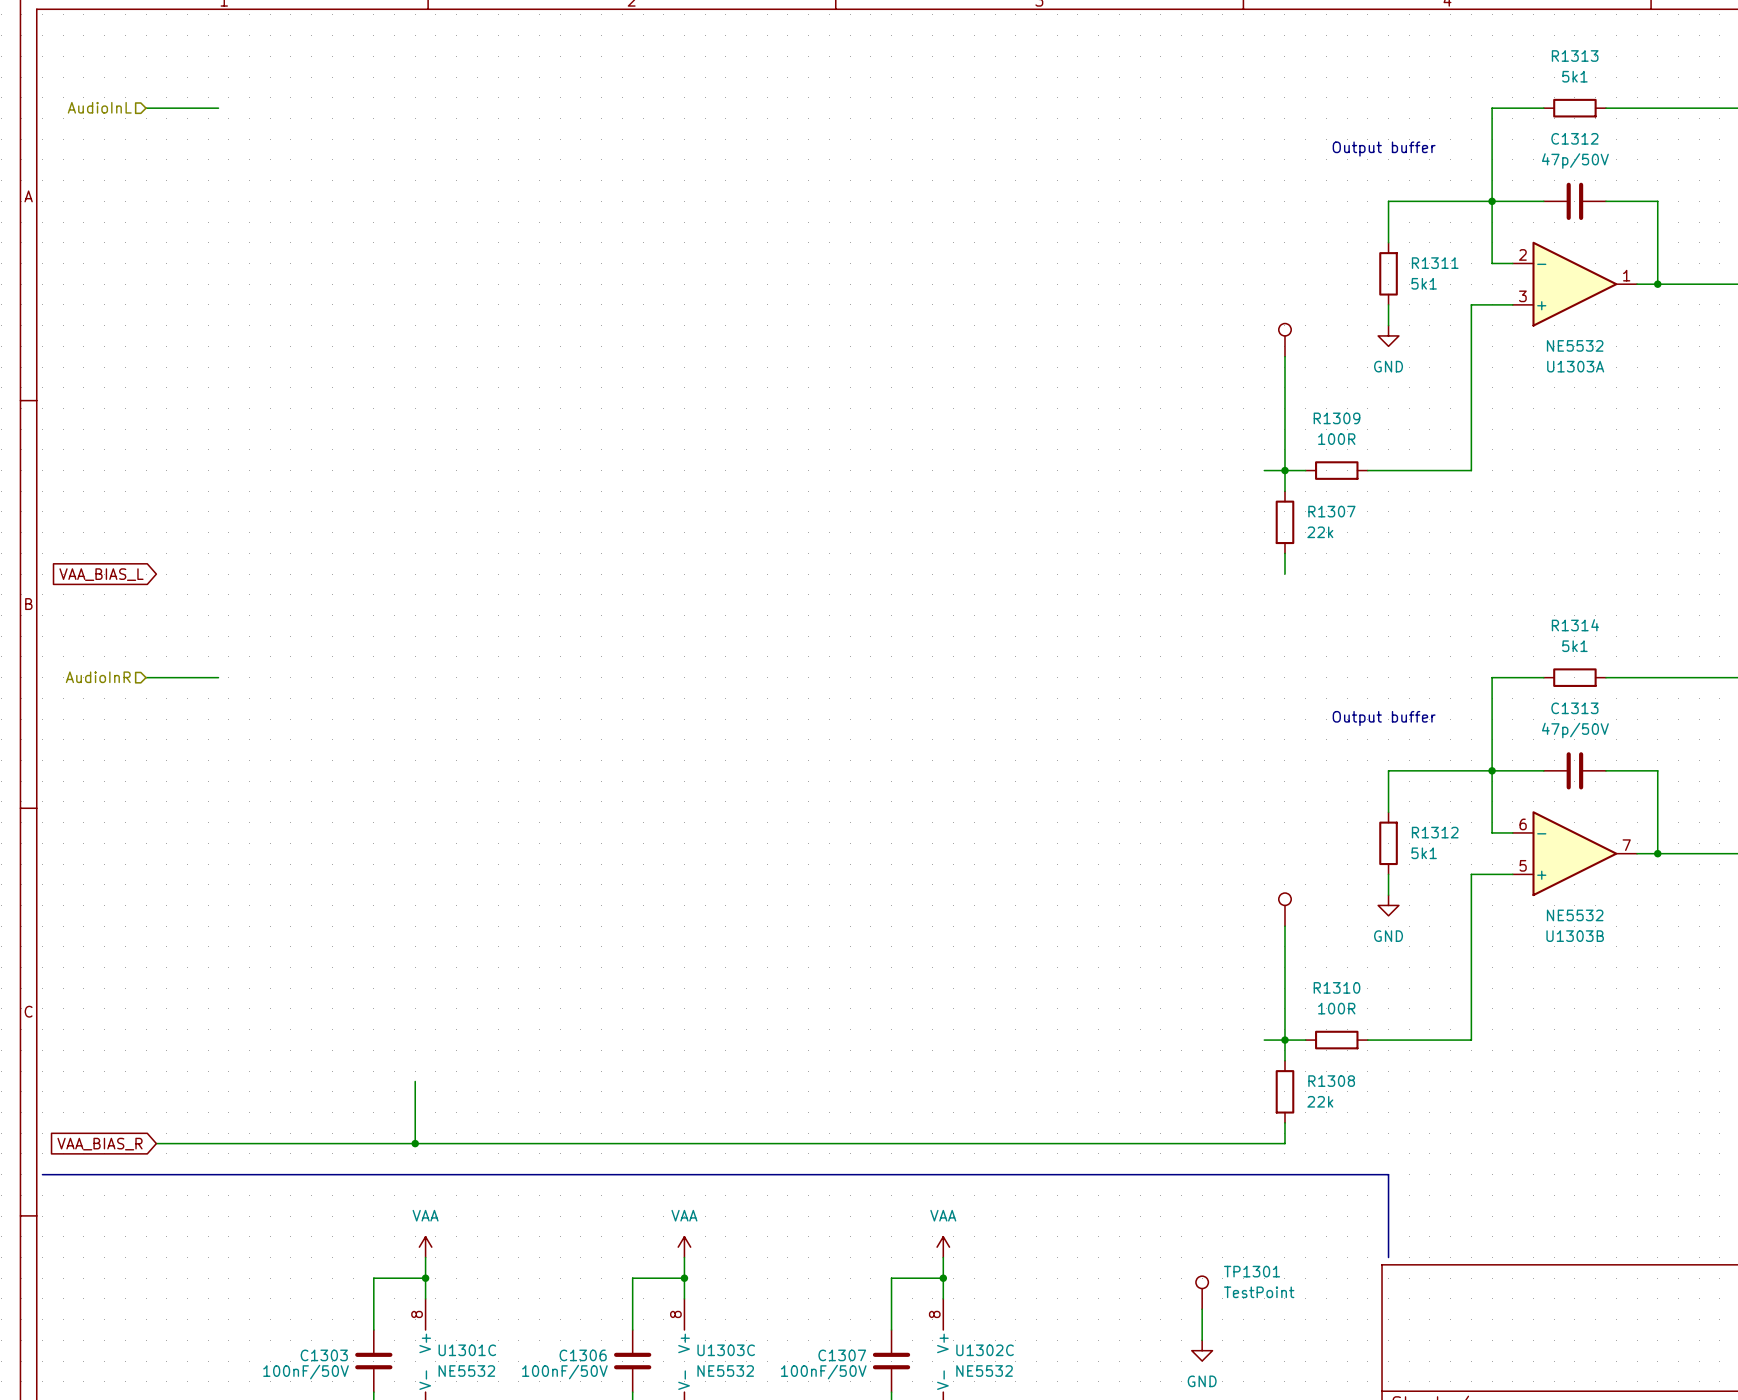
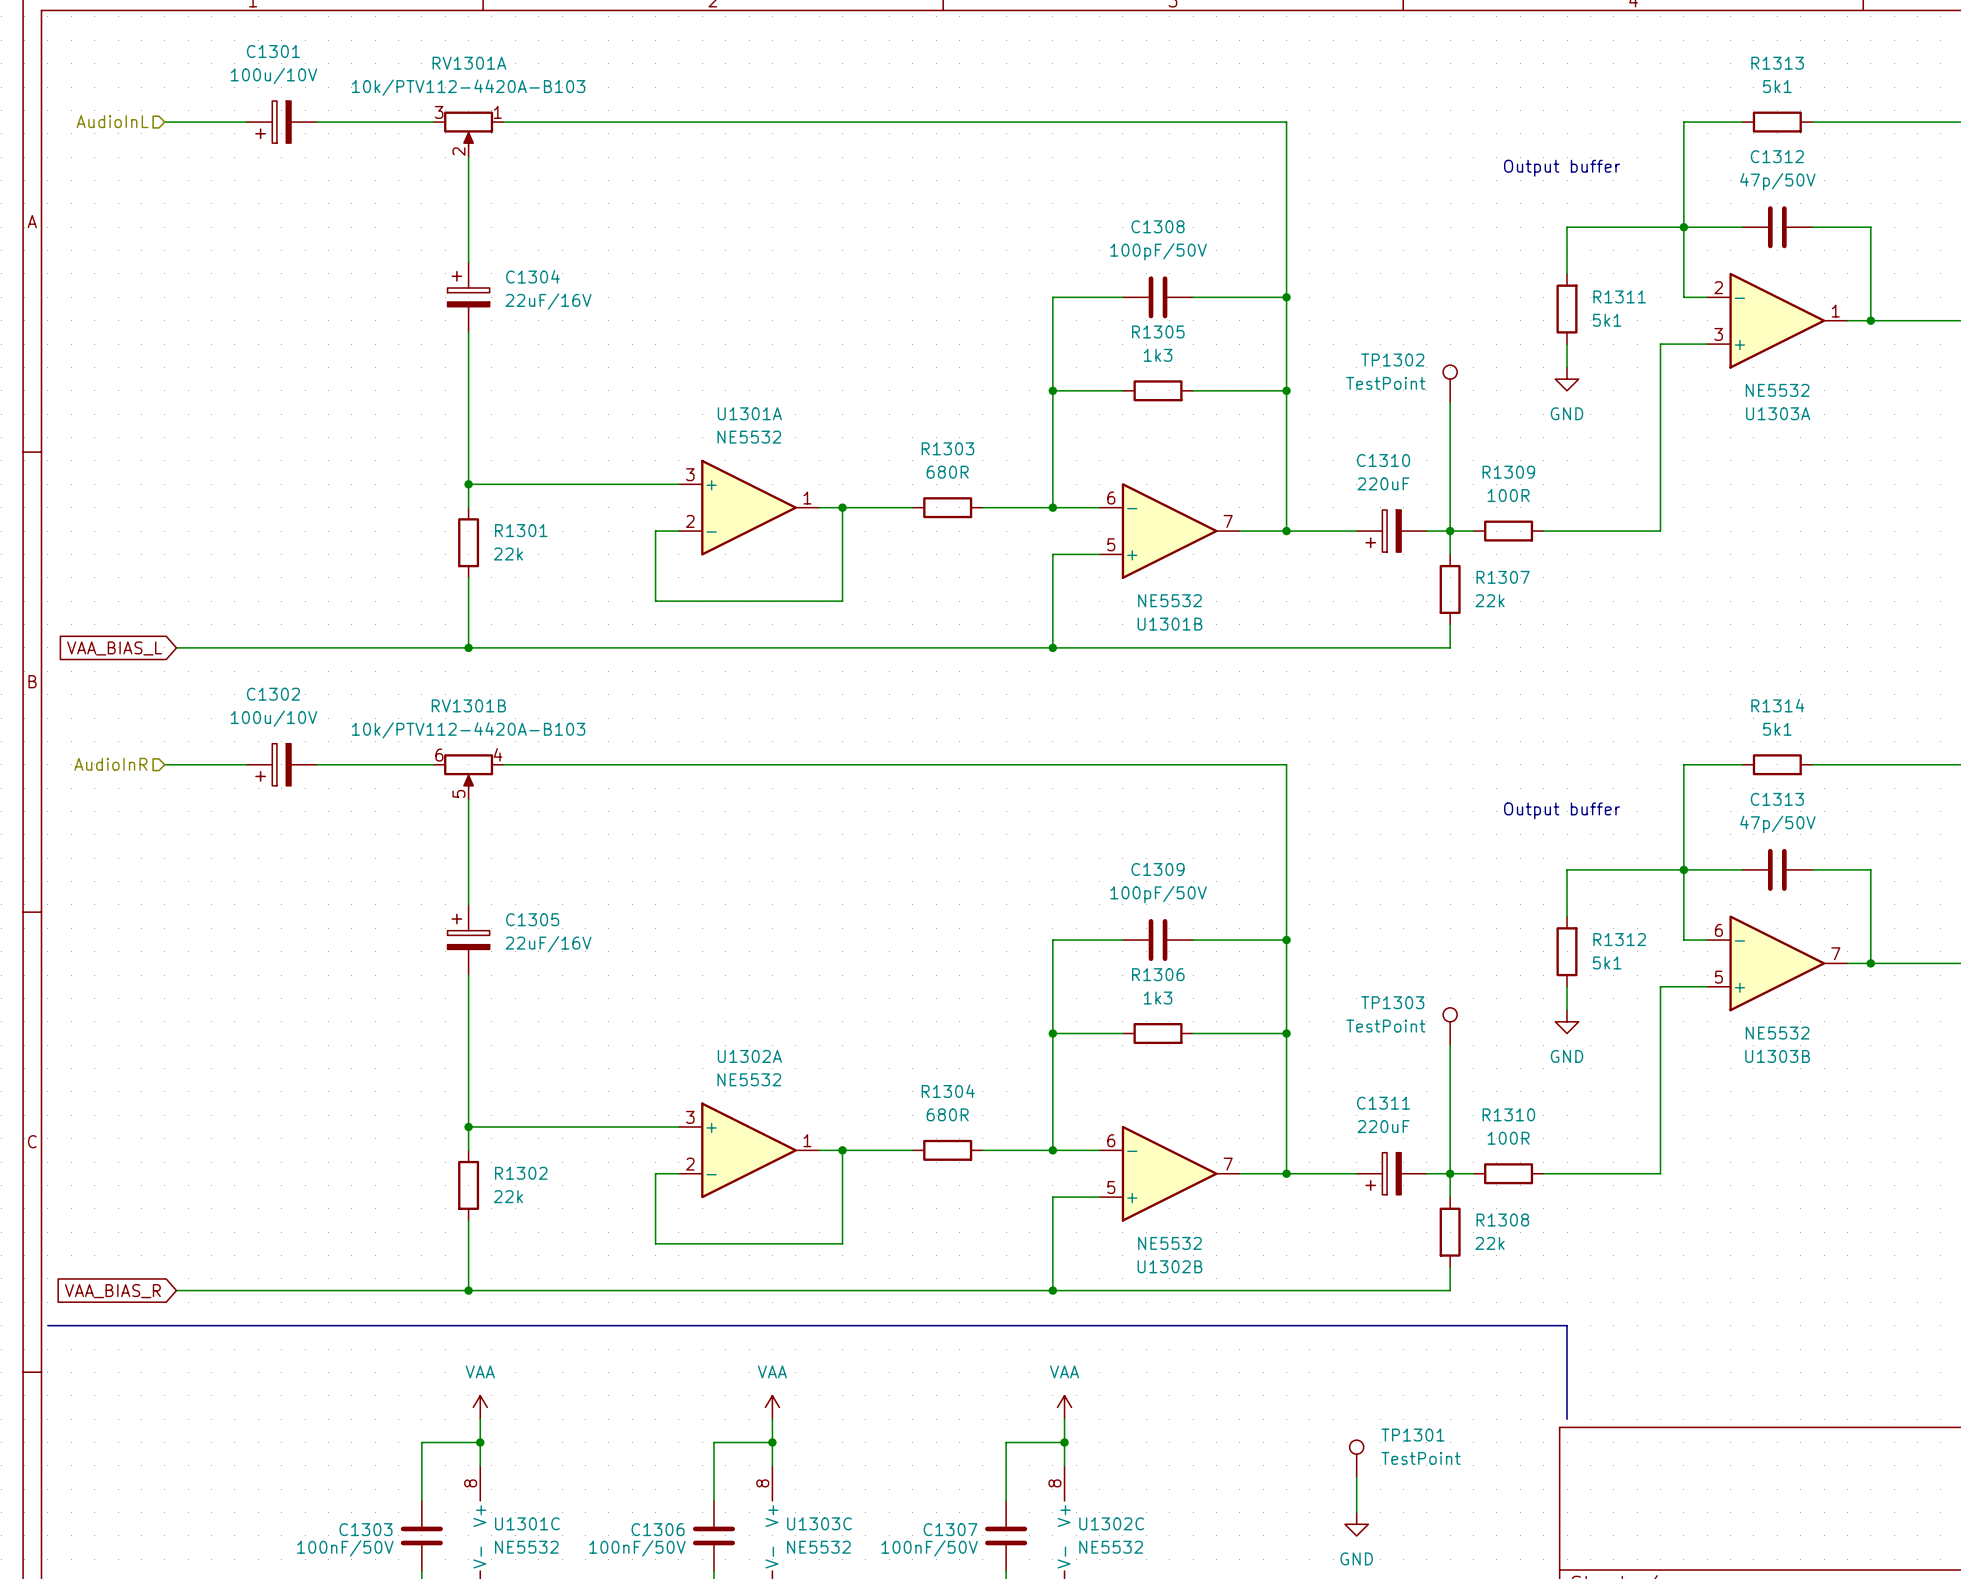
C1301: none -> 100u/10V (281, 122)
wire: none -> (316, 122) (433, 122)
wire: none -> (503, 122) (1286, 122) (1286, 531)
RV1301A: none -> 10k/PTV112-4420A-B103 (468, 134)
wire: none -> (468, 157) (468, 262)
C1304: none -> 22uF/16V (468, 297)
wire: none -> (1122, 297) (1052, 297) (1052, 507)
C1308: none -> 100pF/50V (1158, 297)
wire: none -> (1193, 297) (1286, 297)
junction: none -> (1286, 297)
wire: none -> (468, 332) (468, 507)
TP1302 name: none -> TP1302 (1392, 360)
TP1302 value: none -> TestPoint (1385, 383)
wire: none -> (1052, 390) (1122, 390)
junction: none -> (1052, 390)
R1305: none -> 1k3 (1158, 390)
wire: none -> (1193, 390) (1286, 390)
junction: none -> (1286, 390)
wire: none -> (468, 484) (678, 484)
junction: none -> (468, 484)
U1301A: none -> NE5532 (749, 507)
wire: none -> (819, 507) (912, 507)
wire: none -> (842, 507) (842, 601) (655, 601) (655, 531) (678, 531)
junction: none -> (842, 507)
R1303: none -> 680R (947, 507)
wire: none -> (982, 507) (1099, 507)
junction: none -> (1052, 507)
U1301B: none -> NE5532 (1169, 531)
wire: none -> (1239, 531) (1356, 531)
junction: none -> (1286, 531)
C1310: none -> 220uF (1391, 531)
R1301: none -> 22k (468, 542)
wire: none -> (1099, 554) (1052, 554) (1052, 647)
wire: none -> (468, 577) (468, 647)
wire: none -> (176, 647) (1450, 647)
junction: none -> (468, 647)
junction: none -> (1052, 647)
C1302: none -> 100u/10V (281, 764)
wire: none -> (316, 764) (433, 764)
wire: none -> (503, 764) (1286, 764) (1286, 1173)
RV1301B: none -> 10k/PTV112-4420A-B103 (468, 777)
wire: none -> (468, 799) (468, 904)
C1305: none -> 22uF/16V (468, 940)
wire: none -> (1122, 940) (1052, 940) (1052, 1150)
C1309: none -> 100pF/50V (1158, 940)
wire: none -> (1193, 940) (1286, 940)
junction: none -> (1286, 940)
wire: none -> (468, 975) (468, 1150)
TP1303 name: none -> TP1303 (1392, 1002)
TP1303 value: none -> TestPoint (1385, 1026)
wire: none -> (1052, 1033) (1122, 1033)
junction: none -> (1052, 1033)
R1306: none -> 1k3 (1158, 1033)
wire: none -> (1193, 1033) (1286, 1033)
junction: none -> (1286, 1033)
wire: none -> (468, 1126) (678, 1126)
junction: none -> (468, 1126)
U1302A: none -> NE5532 (749, 1150)
wire: none -> (819, 1150) (912, 1150)
wire: none -> (842, 1150) (842, 1243) (655, 1243) (655, 1173) (678, 1173)
junction: none -> (842, 1150)
R1304: none -> 680R (947, 1150)
wire: none -> (982, 1150) (1099, 1150)
junction: none -> (1052, 1150)
U1302B: none -> NE5532 (1169, 1173)
wire: none -> (1239, 1173) (1356, 1173)
junction: none -> (1286, 1173)
C1311: none -> 220uF (1391, 1173)
R1302: none -> 22k (468, 1185)
wire: none -> (1099, 1197) (1052, 1197) (1052, 1290)
junction: none -> (1052, 1290)

